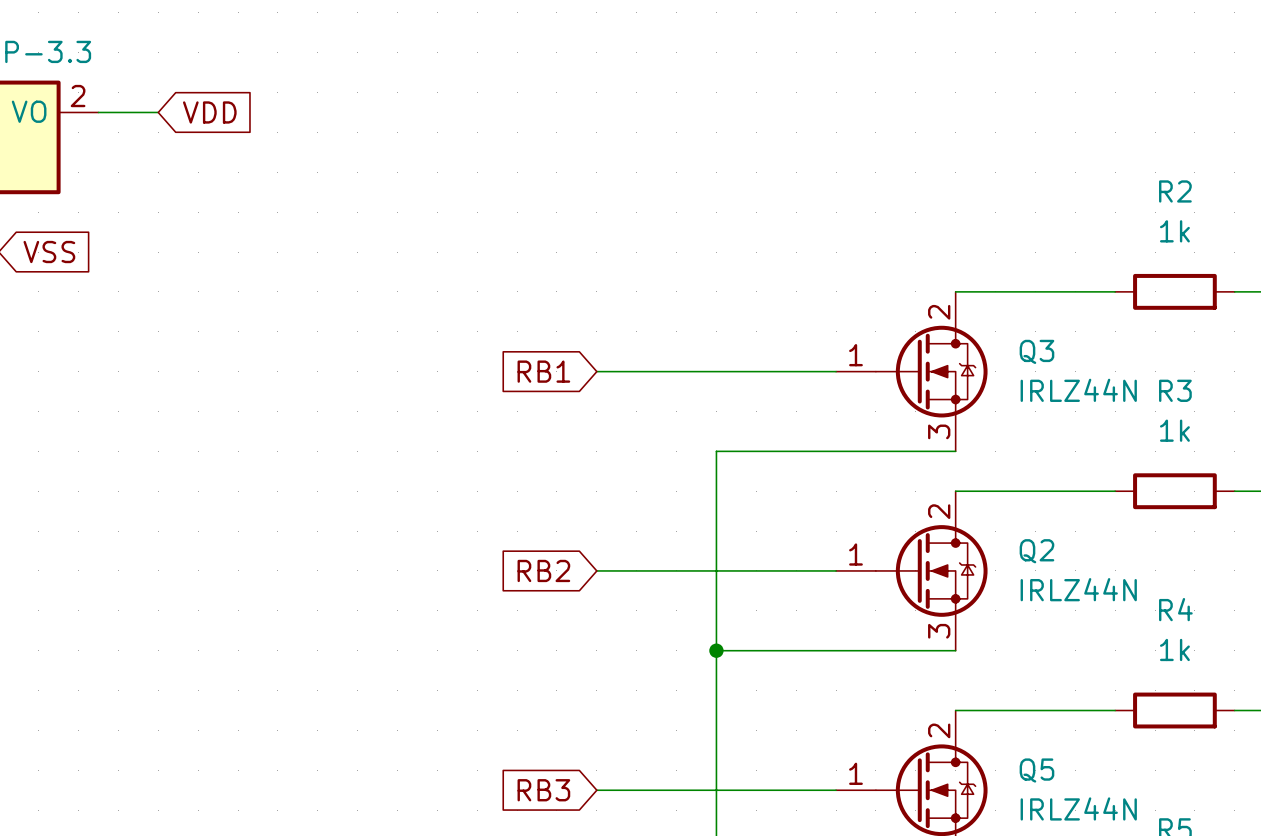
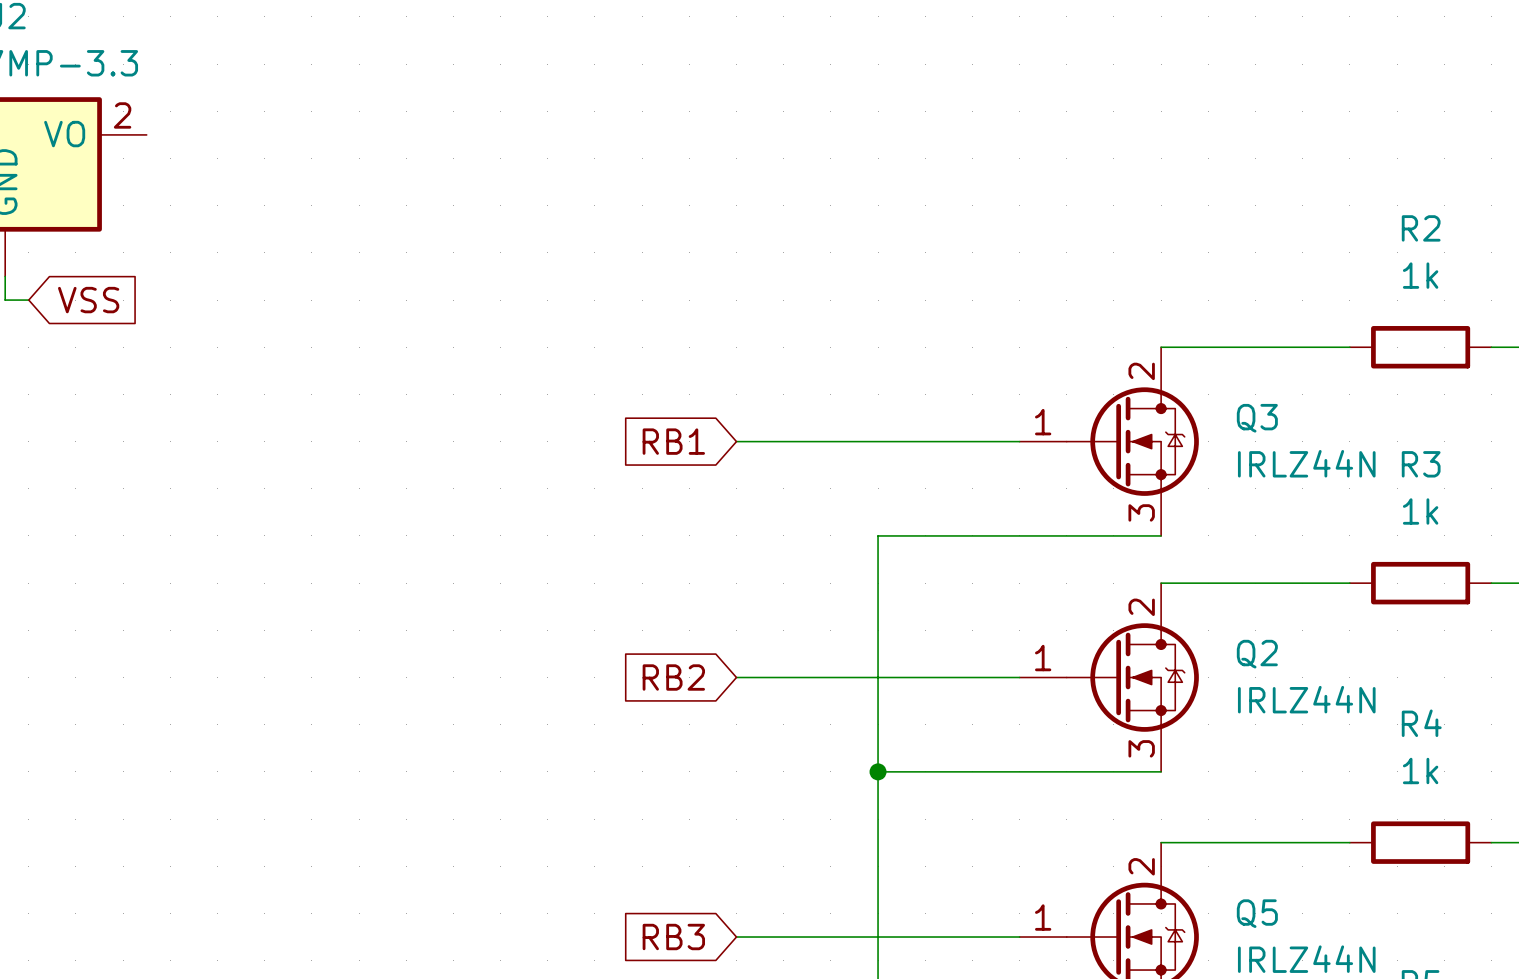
wire: (98, 112) (158, 112) -> none
global label: VDD (209, 112) -> none

